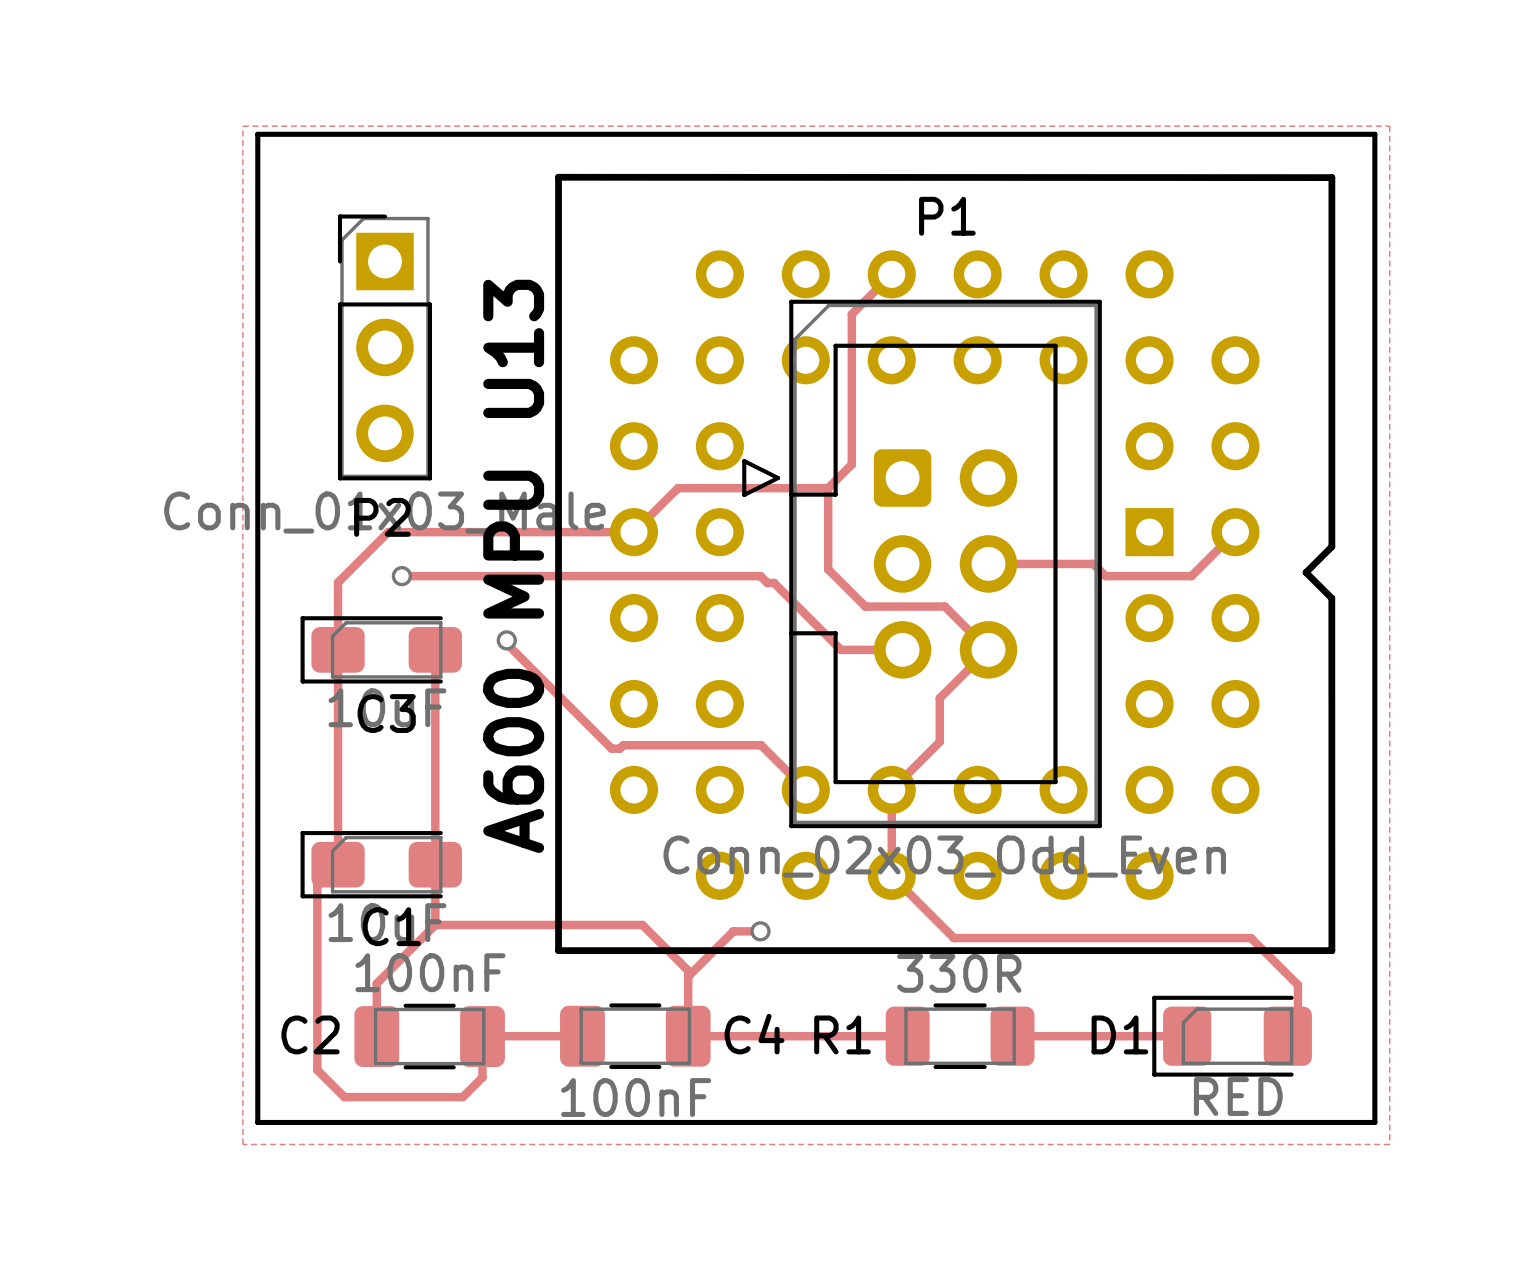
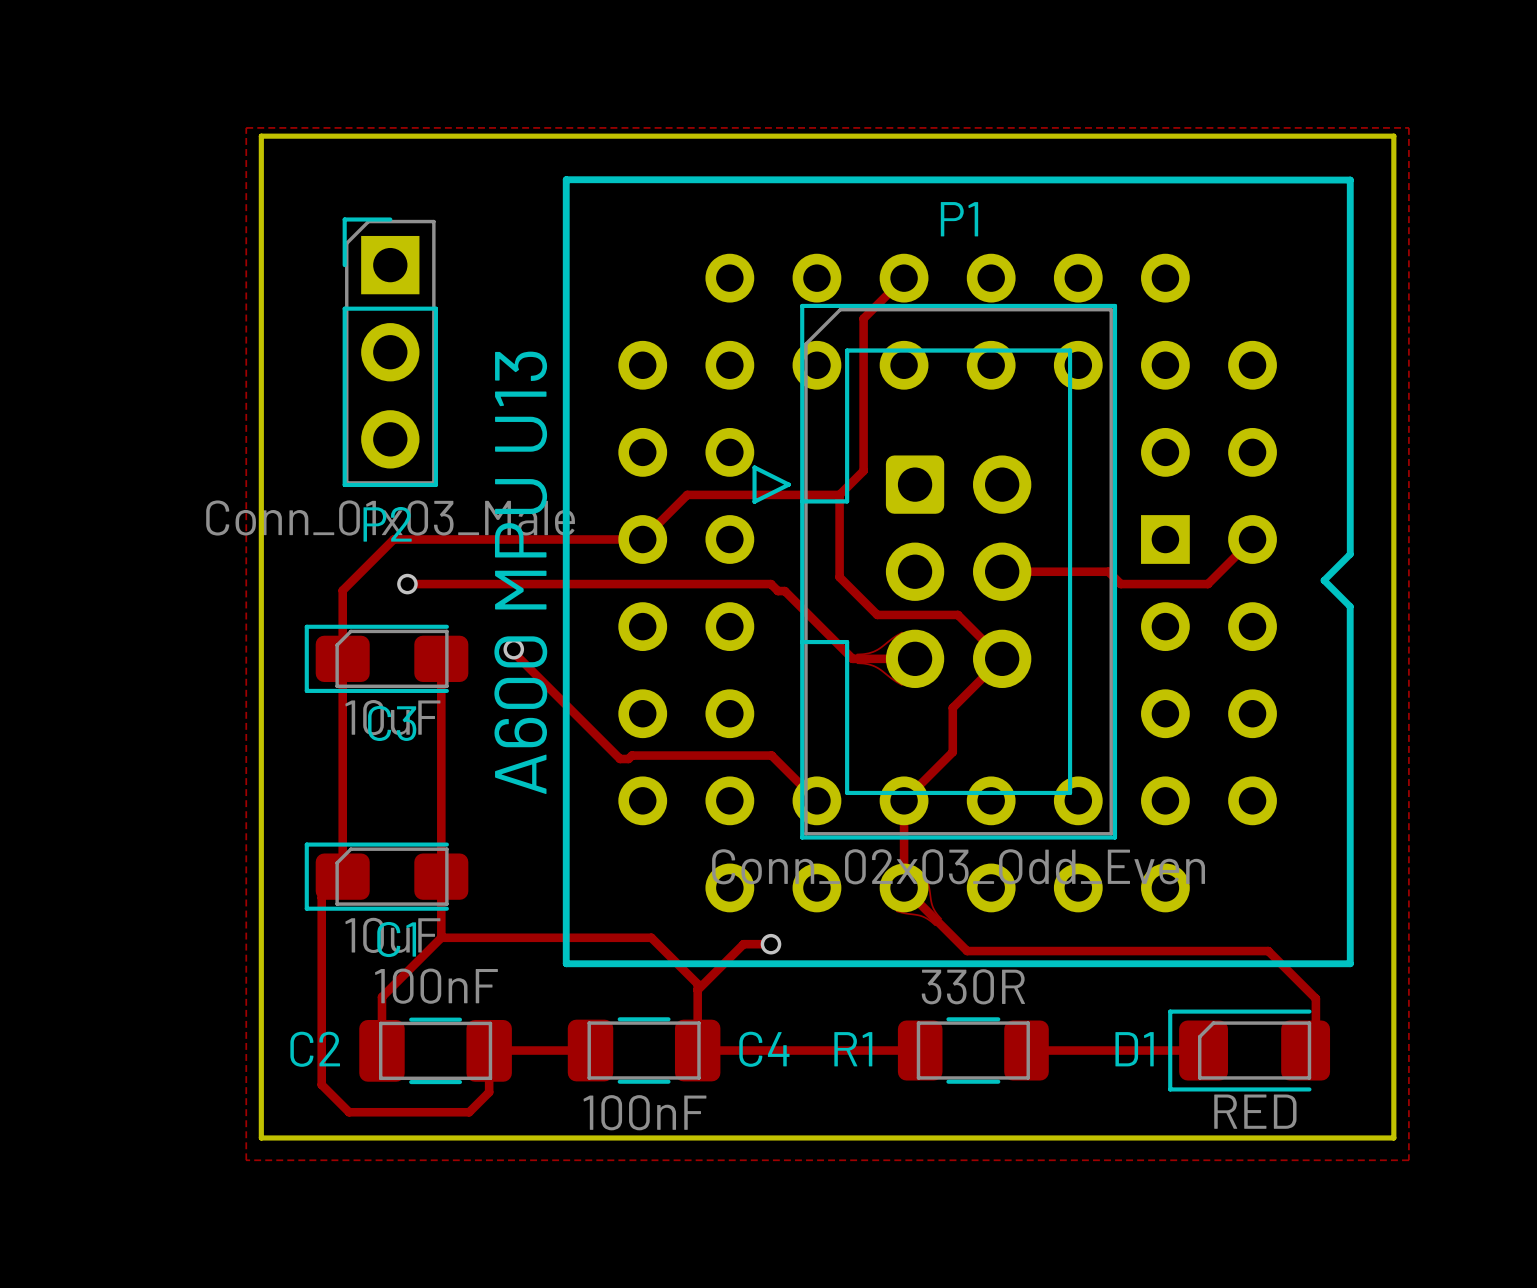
zone outline: none -> (902, 632) (929, 658) (902, 685) (873, 666) (856, 663) (856, 654) (873, 651) (902, 632)
zone outline: none -> (895, 879) (927, 879) (933, 907) (941, 919) (935, 925) (923, 916) (896, 910) (895, 879)

